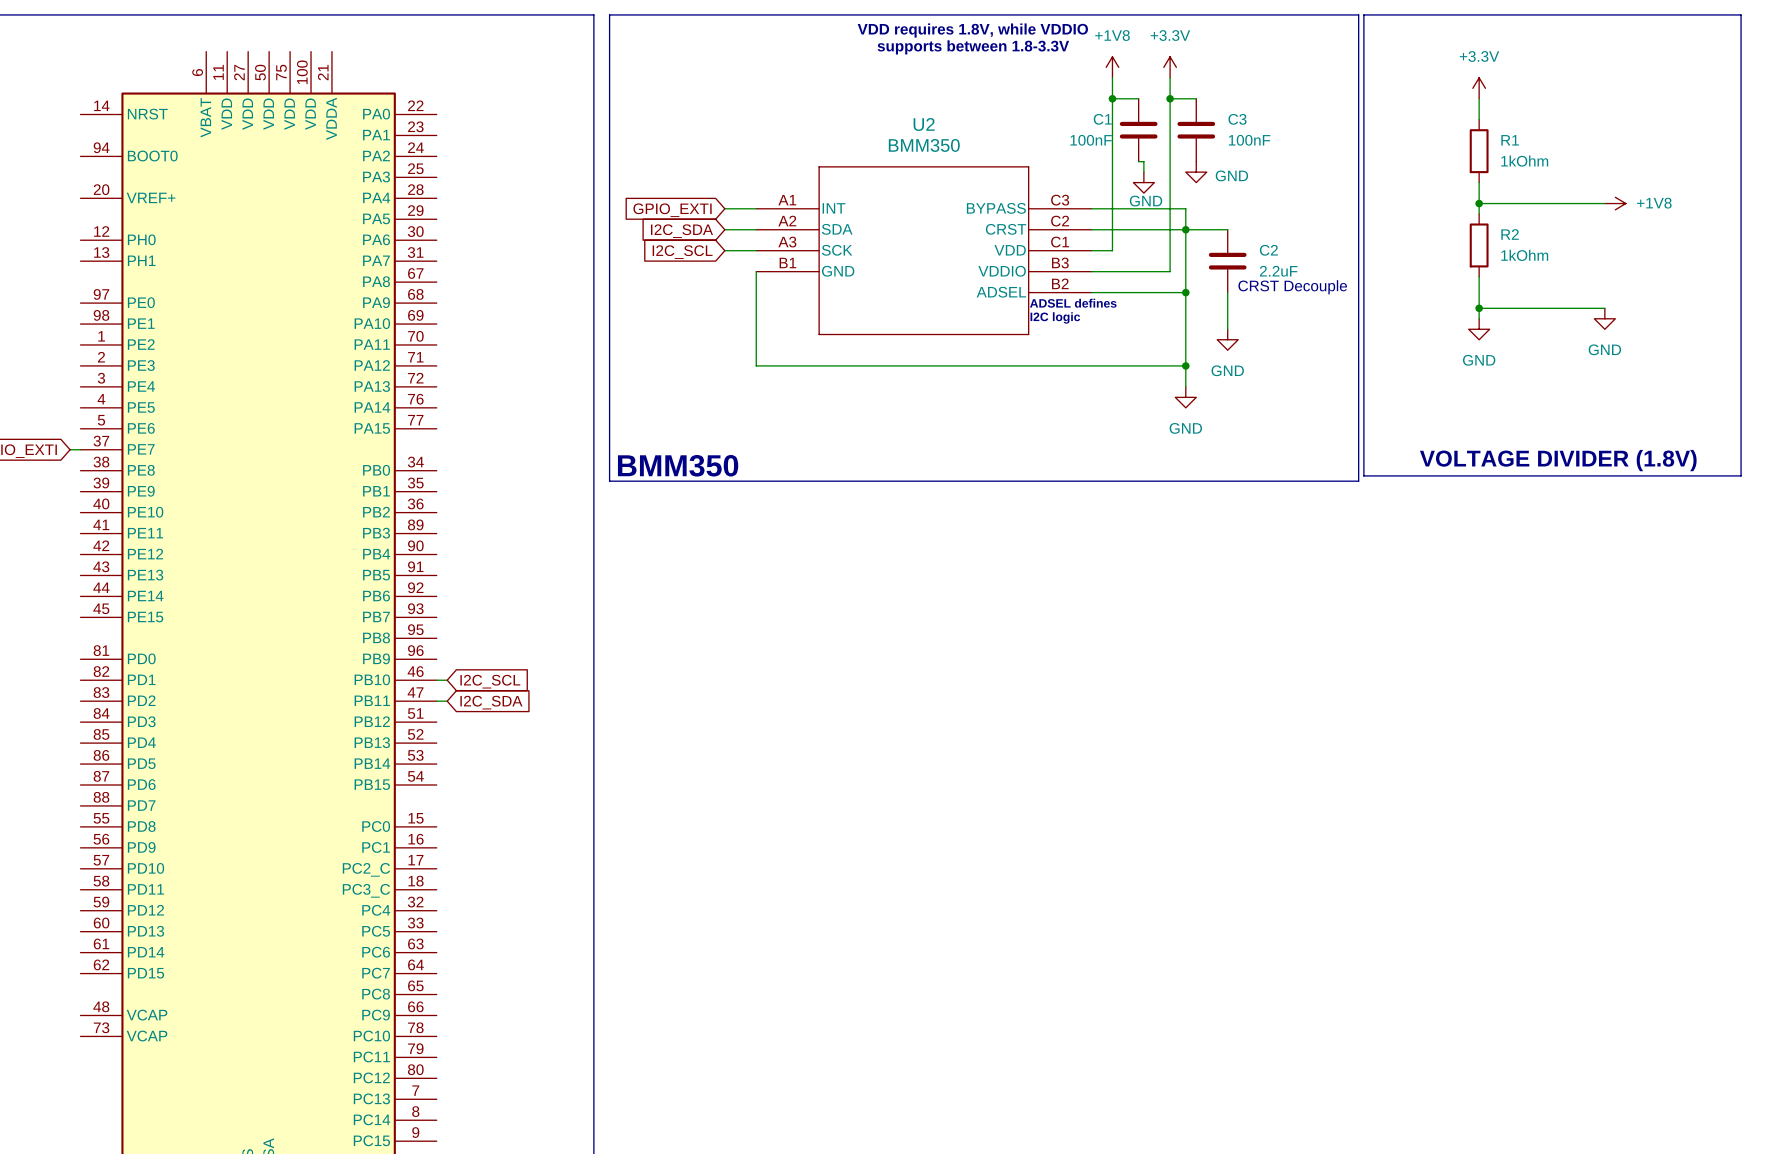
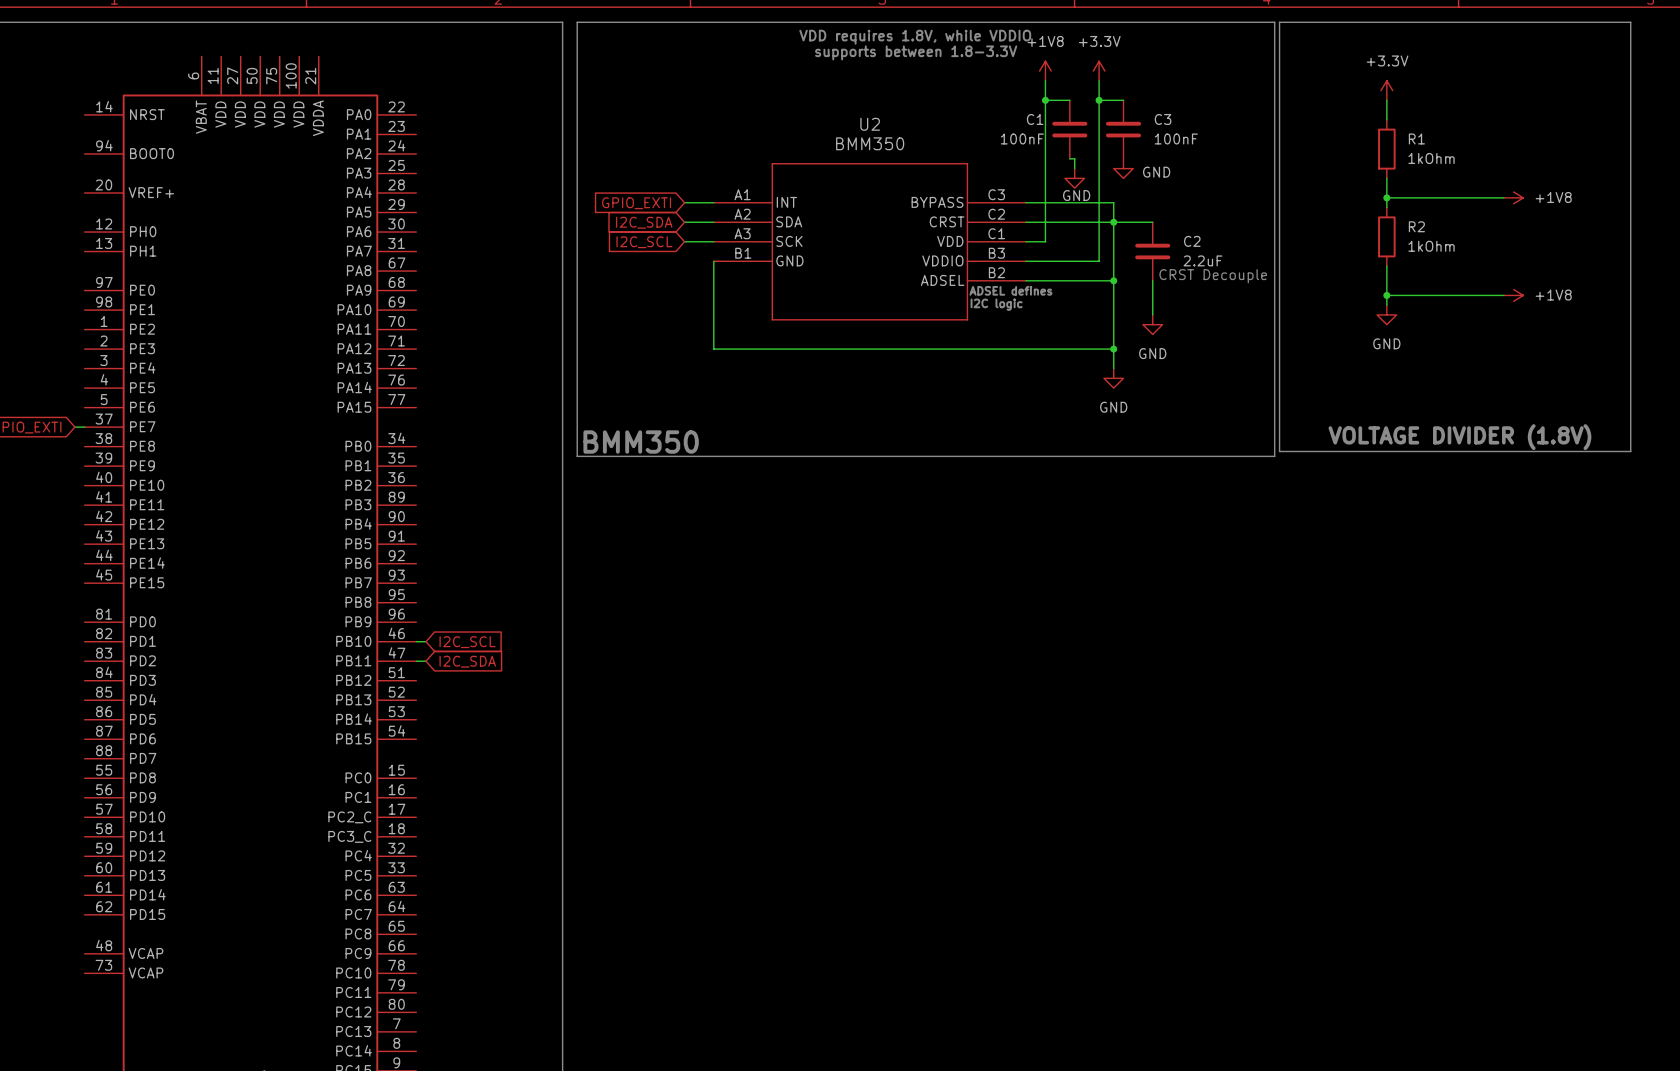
power symbol: none -> +1V8 (1513, 295)
power symbol: GND (1604, 318) -> none

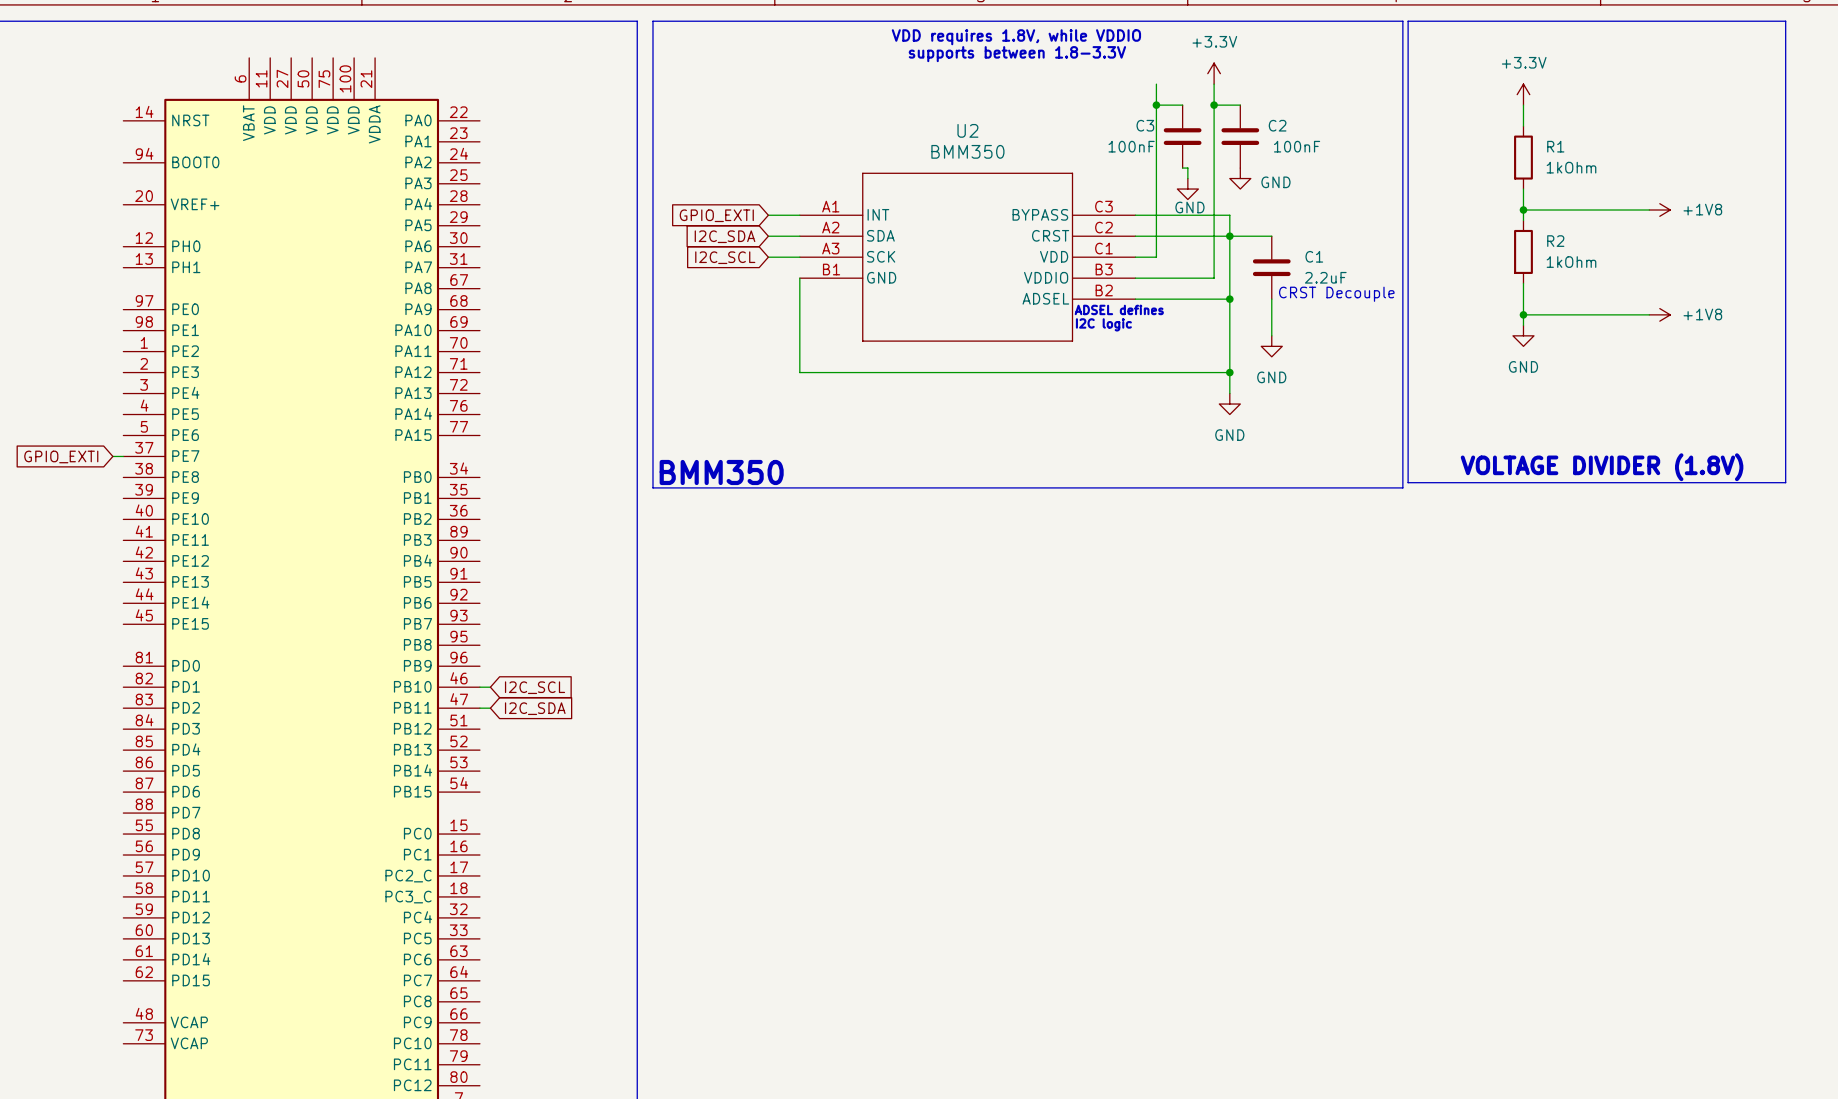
power symbol: +1V8 (1045, 71) -> none
C1 name: C1 (1035, 119) -> C3 (1145, 125)
C3 name: C3 (1163, 119) -> C2 (1277, 125)
C2 name: C2 (1192, 241) -> C1 (1314, 256)

